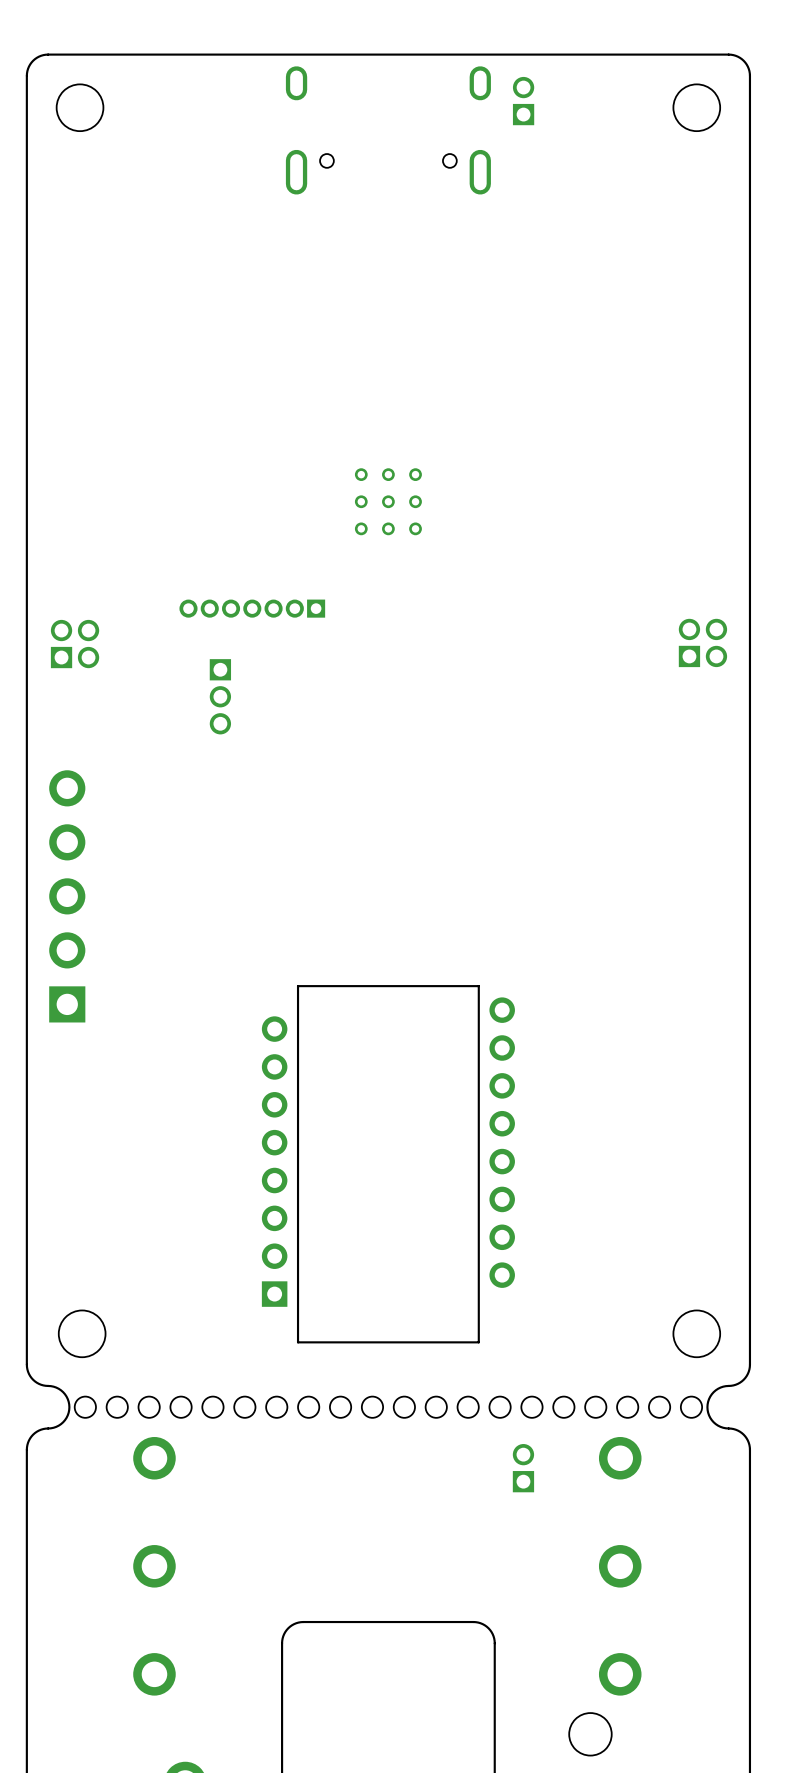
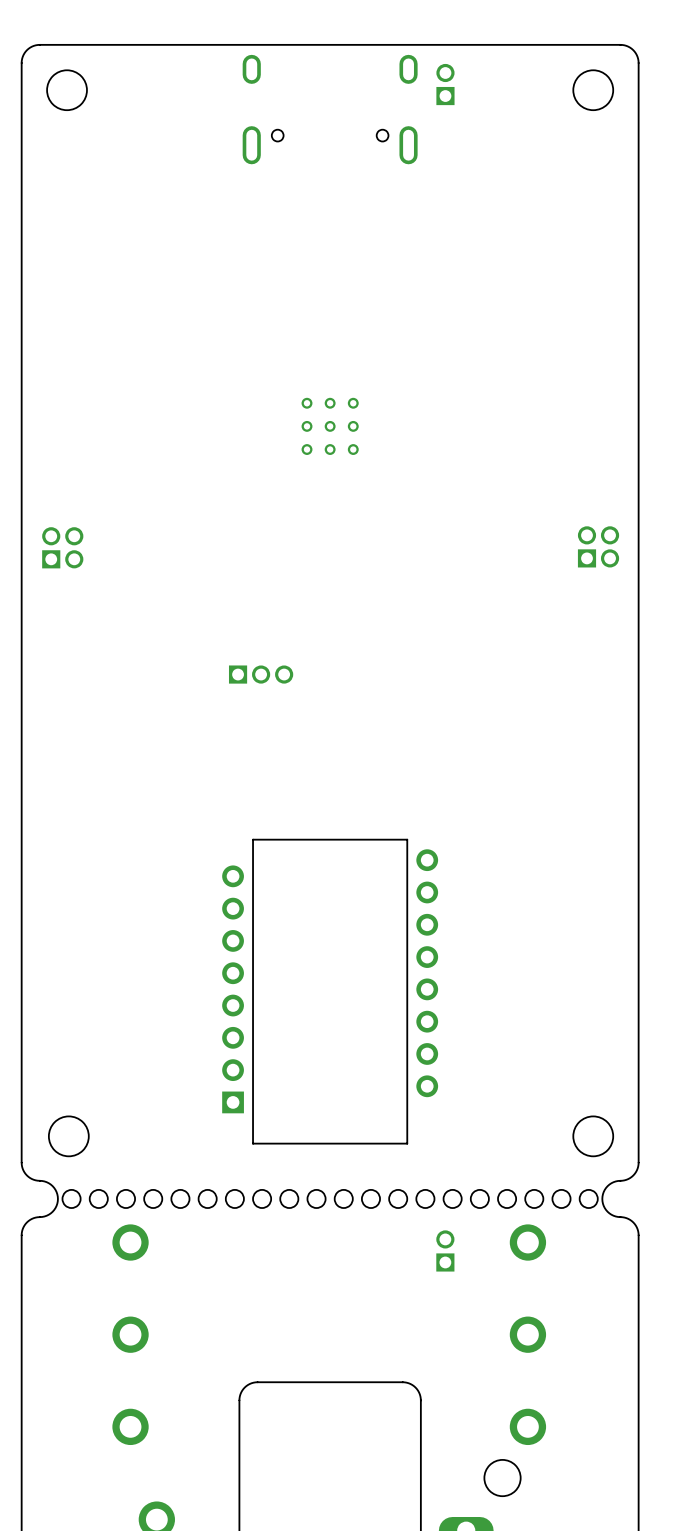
part: (252, 608) -> none
part rotation: 0° (220, 696) -> 90° counterclockwise (261, 674)
part position: (220, 696) -> (261, 674)
part: (67, 896) -> none

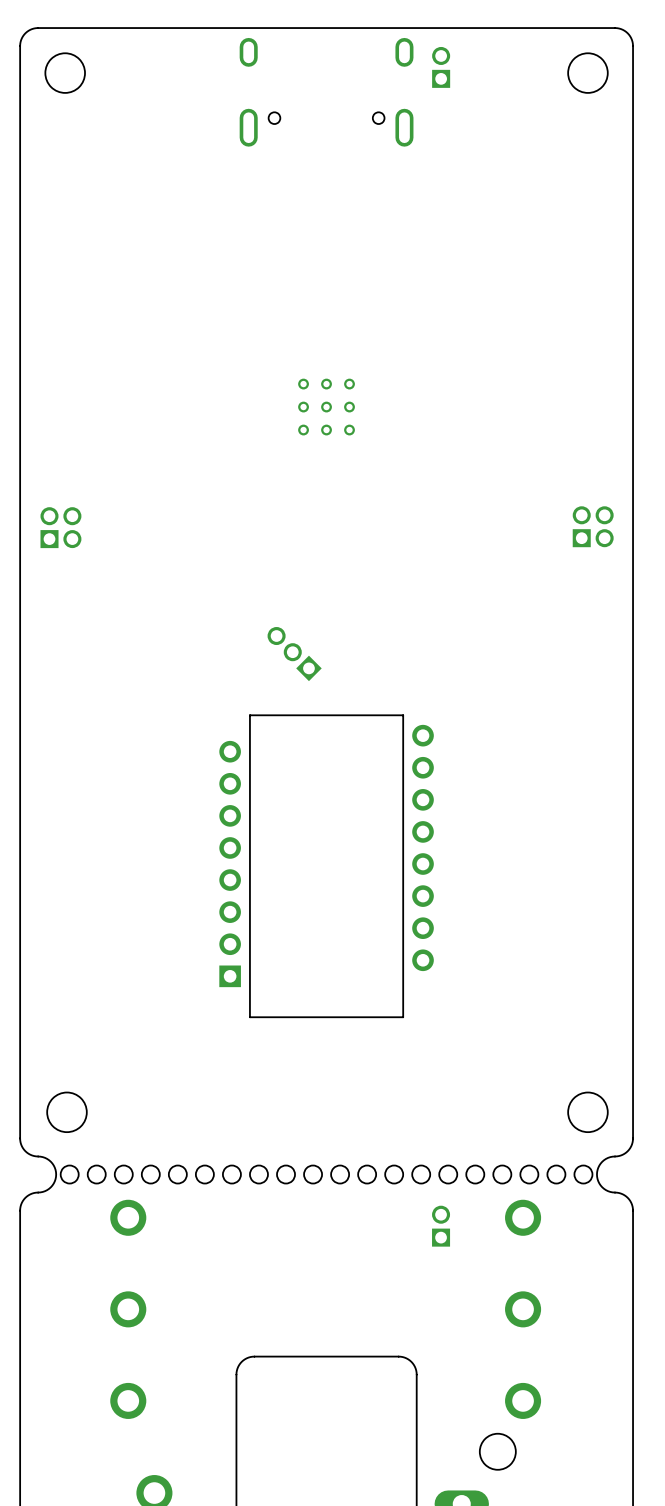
part: (261, 674) -> none
part: none -> (294, 654)
part position: (330, 991) -> (326, 866)

